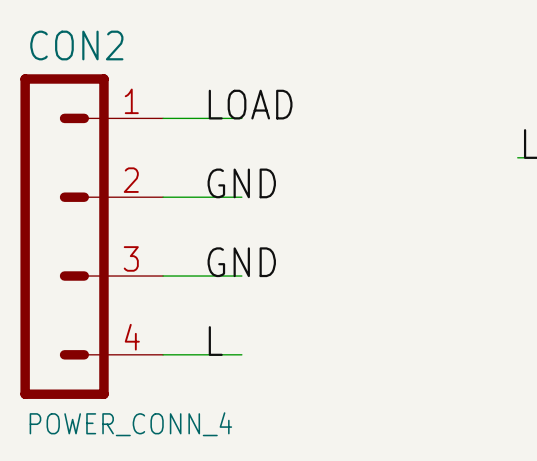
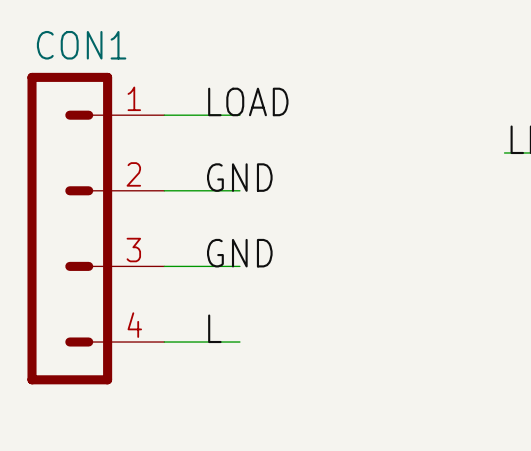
CON2 name: CON2 (76, 45) -> CON1 (81, 45)
CON2 value: POWER_CONN_4 (130, 424) -> none

